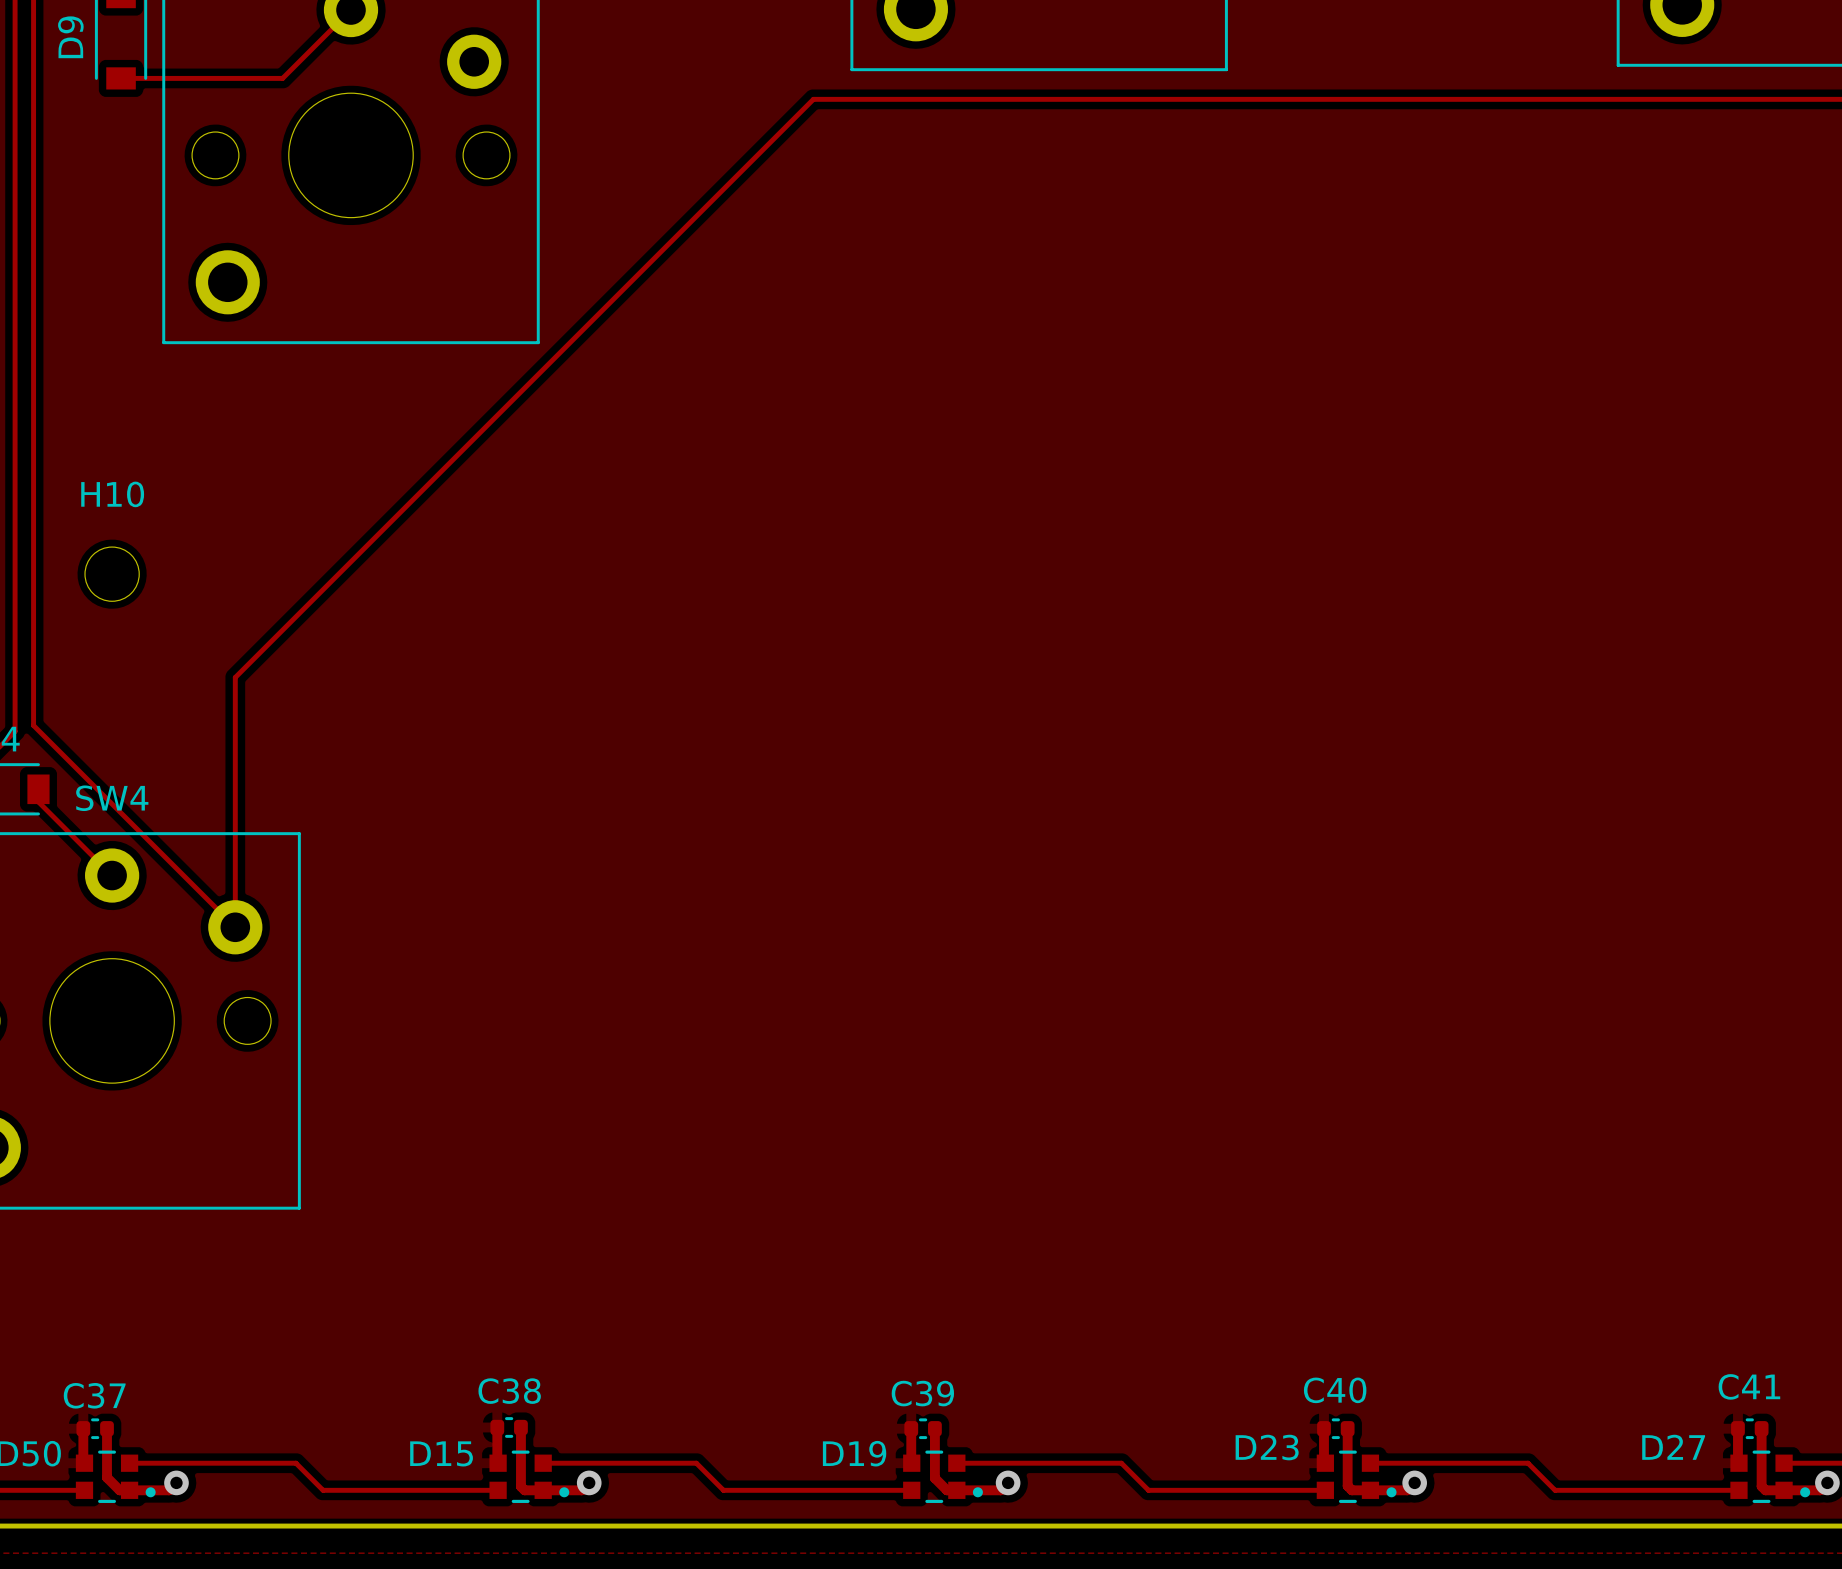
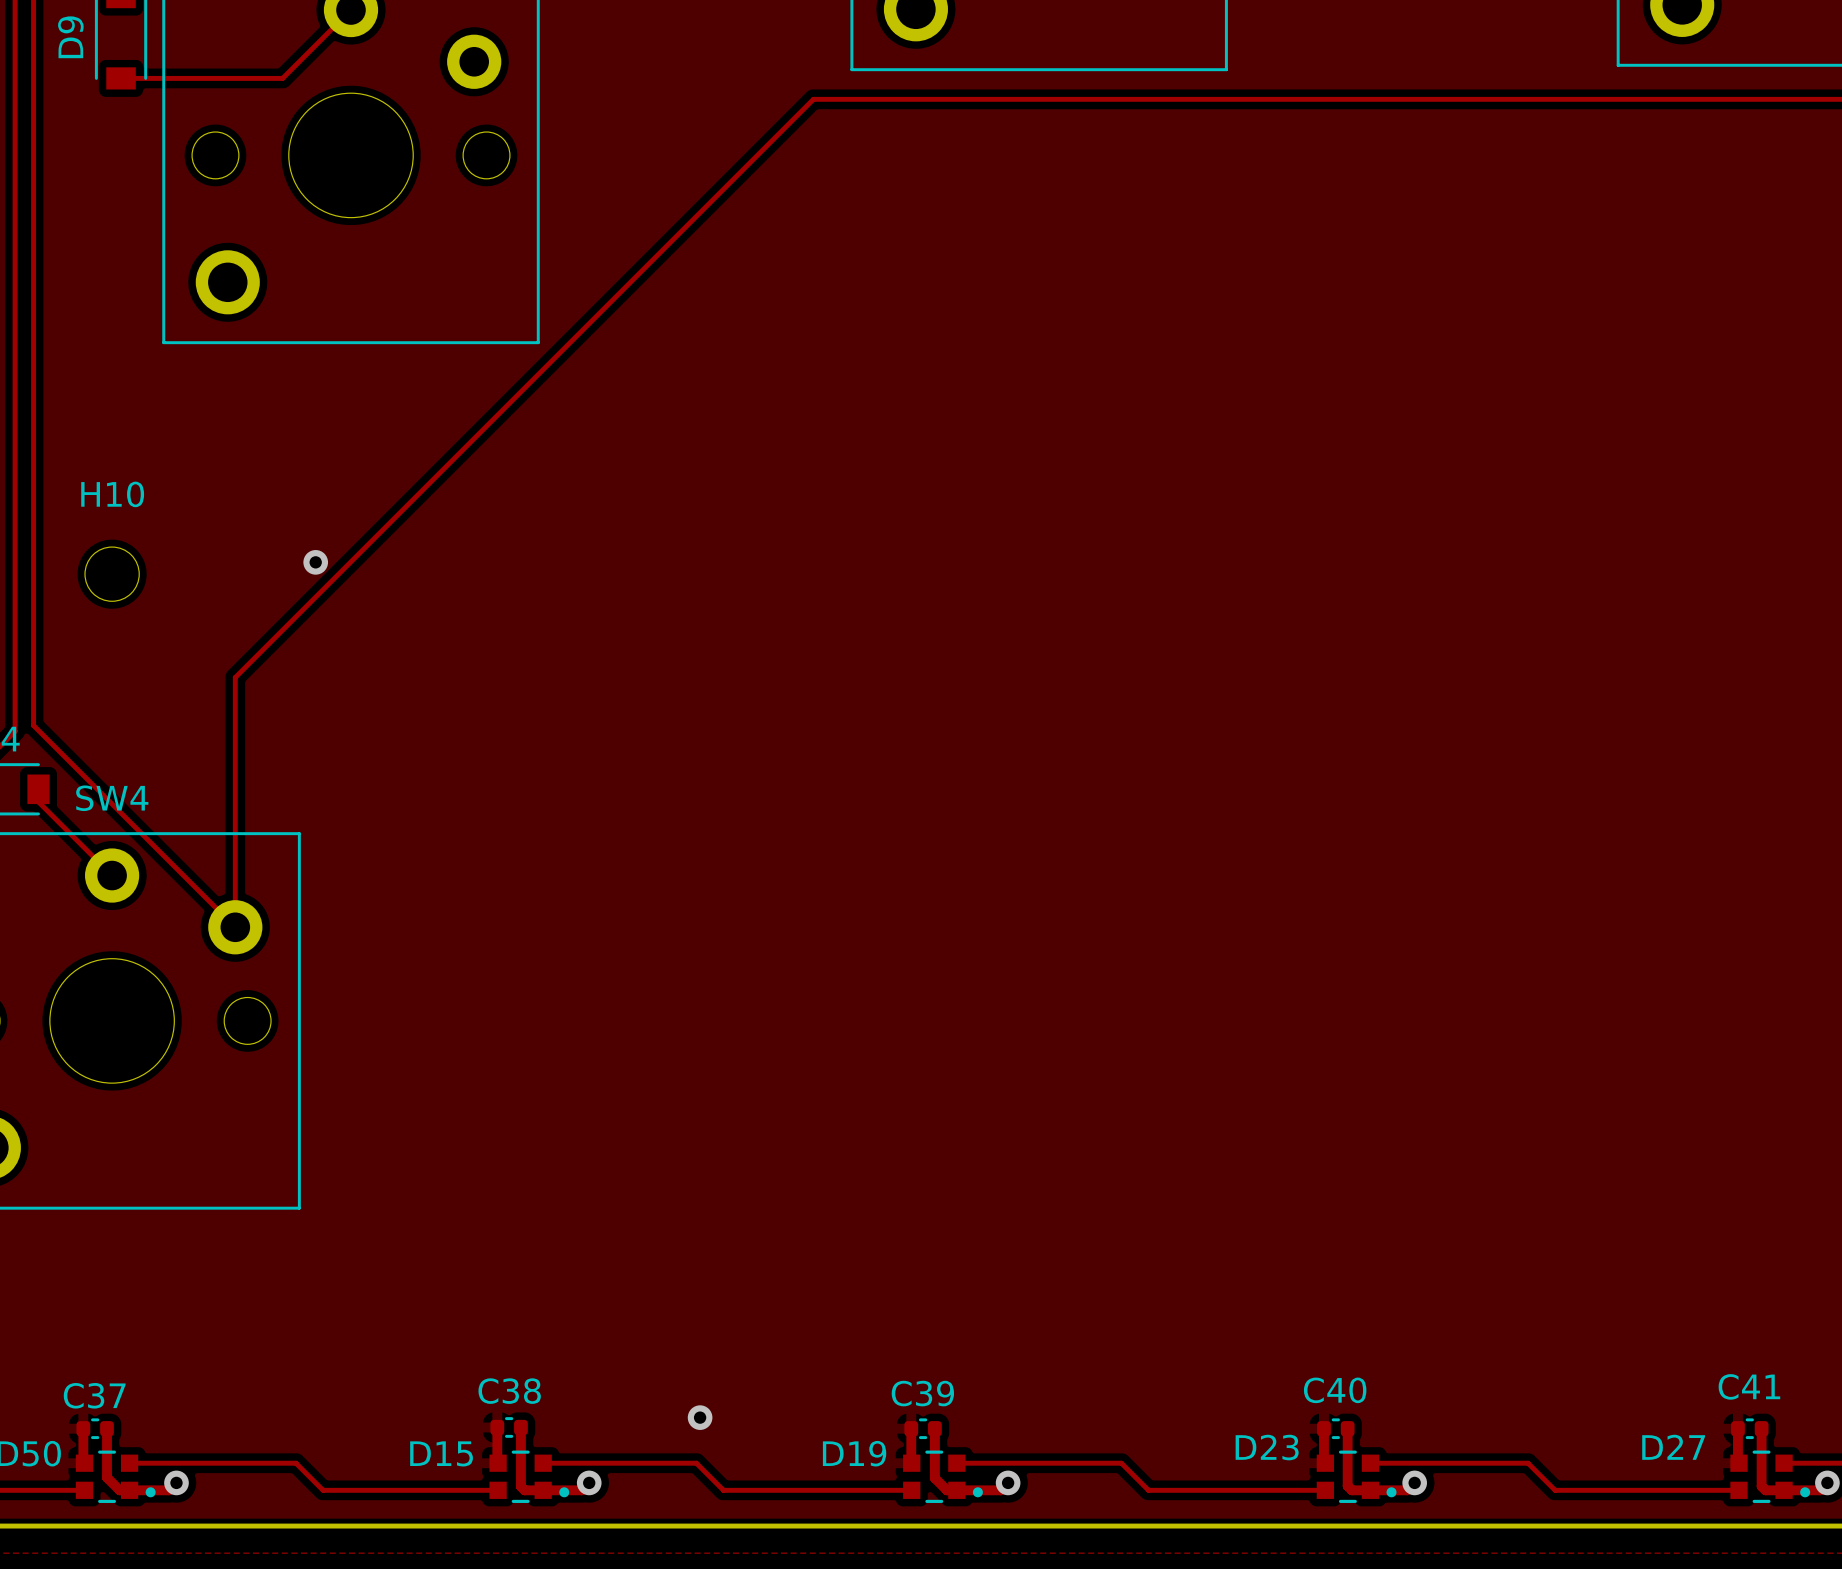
via: none -> (315, 562)
via: none -> (700, 1417)

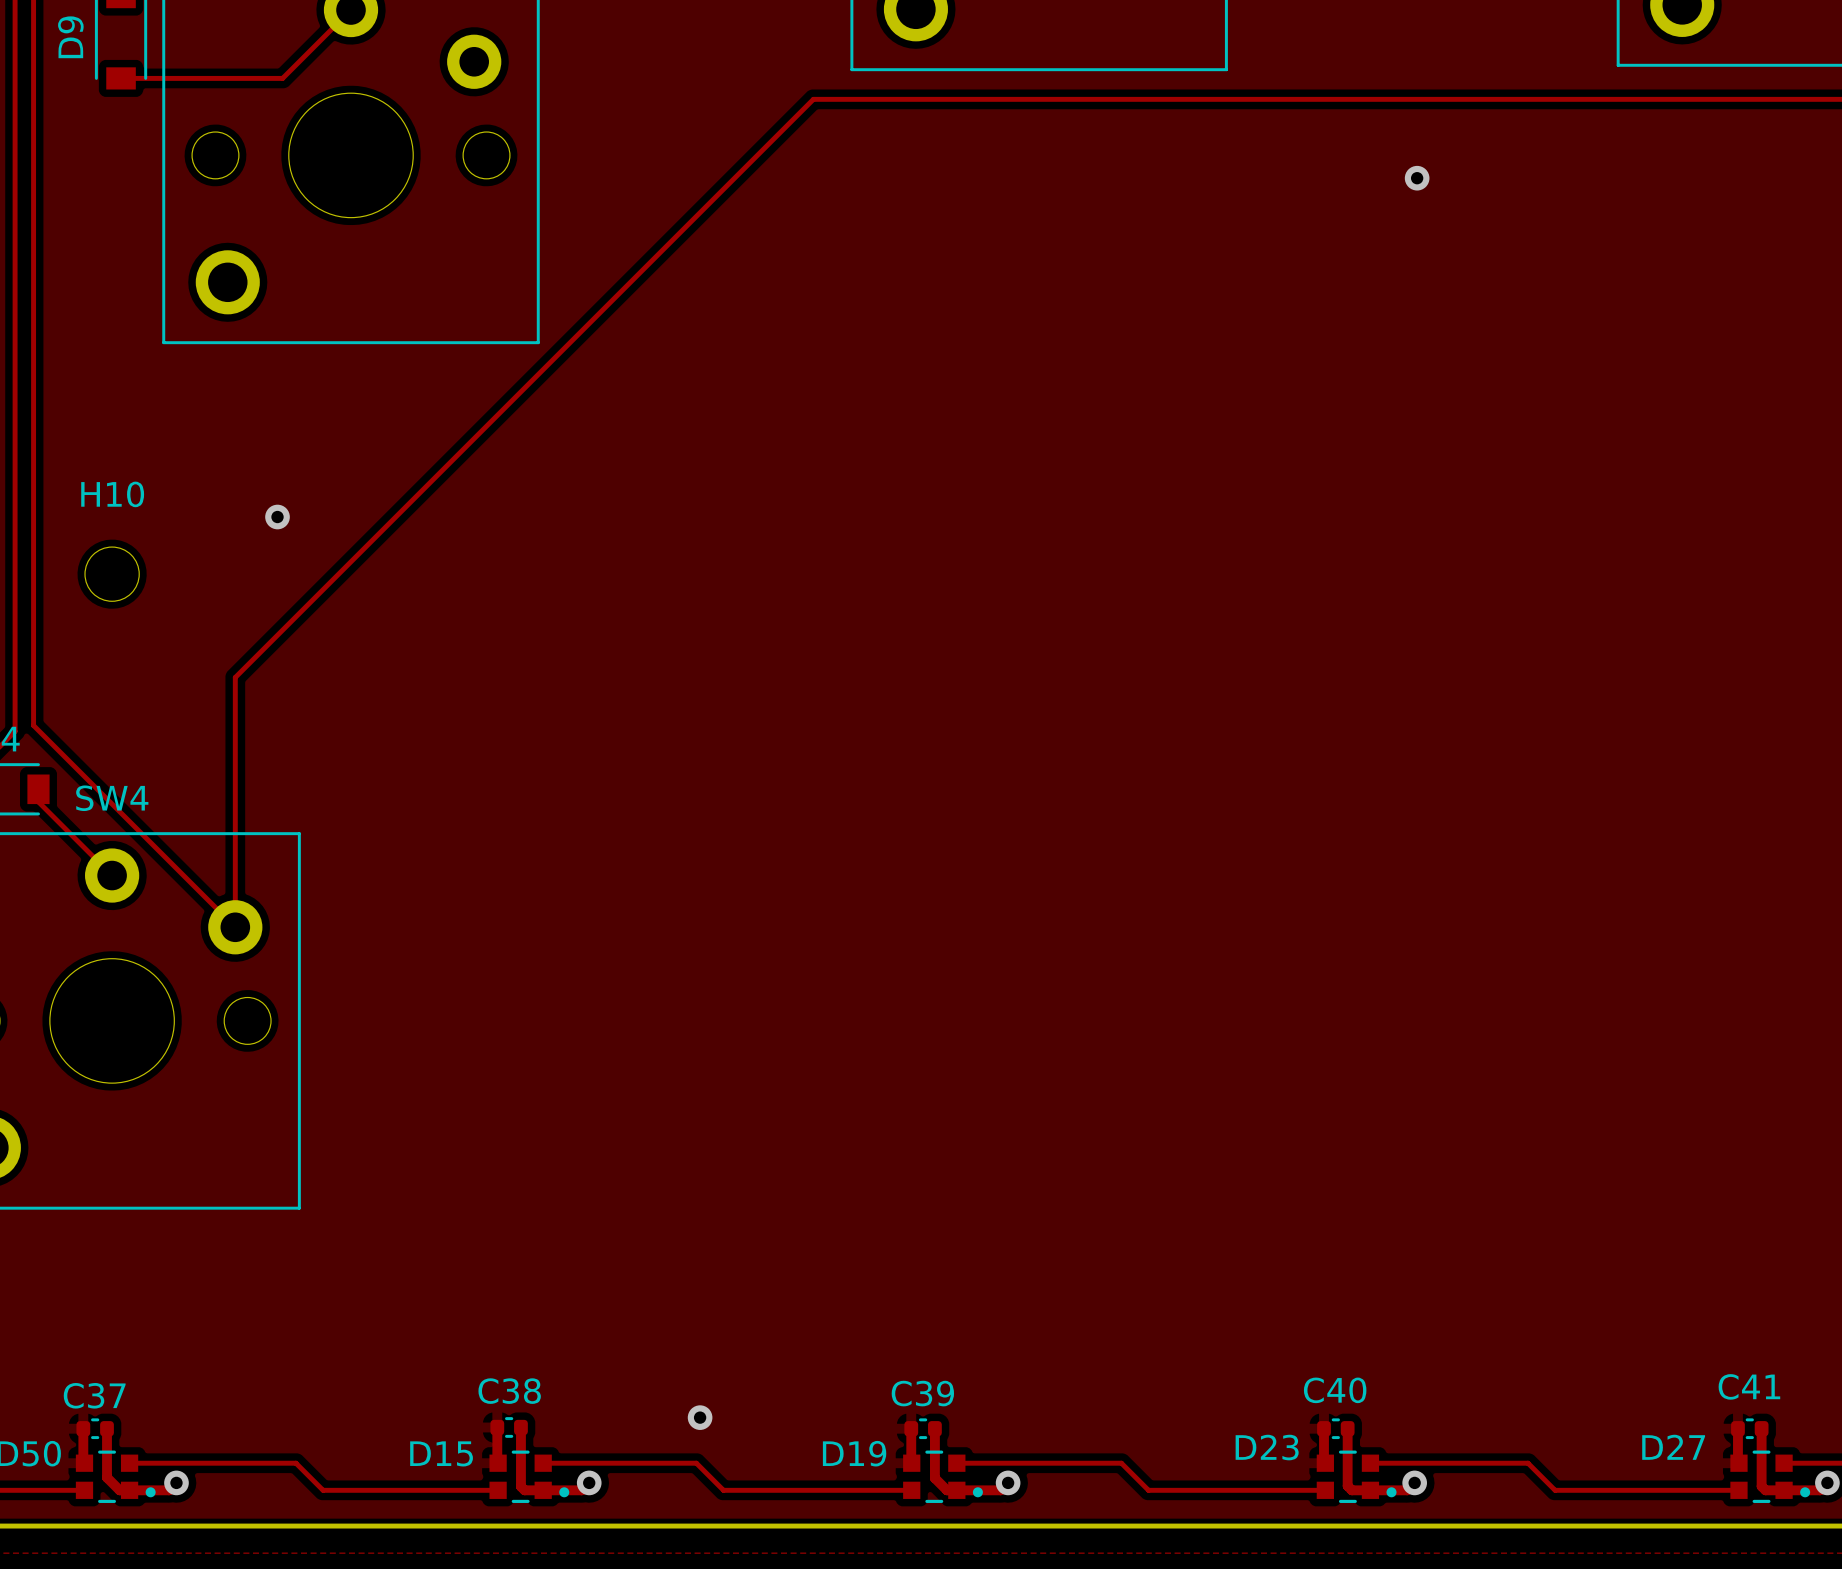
via: none -> (1417, 178)
via position: (315, 562) -> (277, 517)

